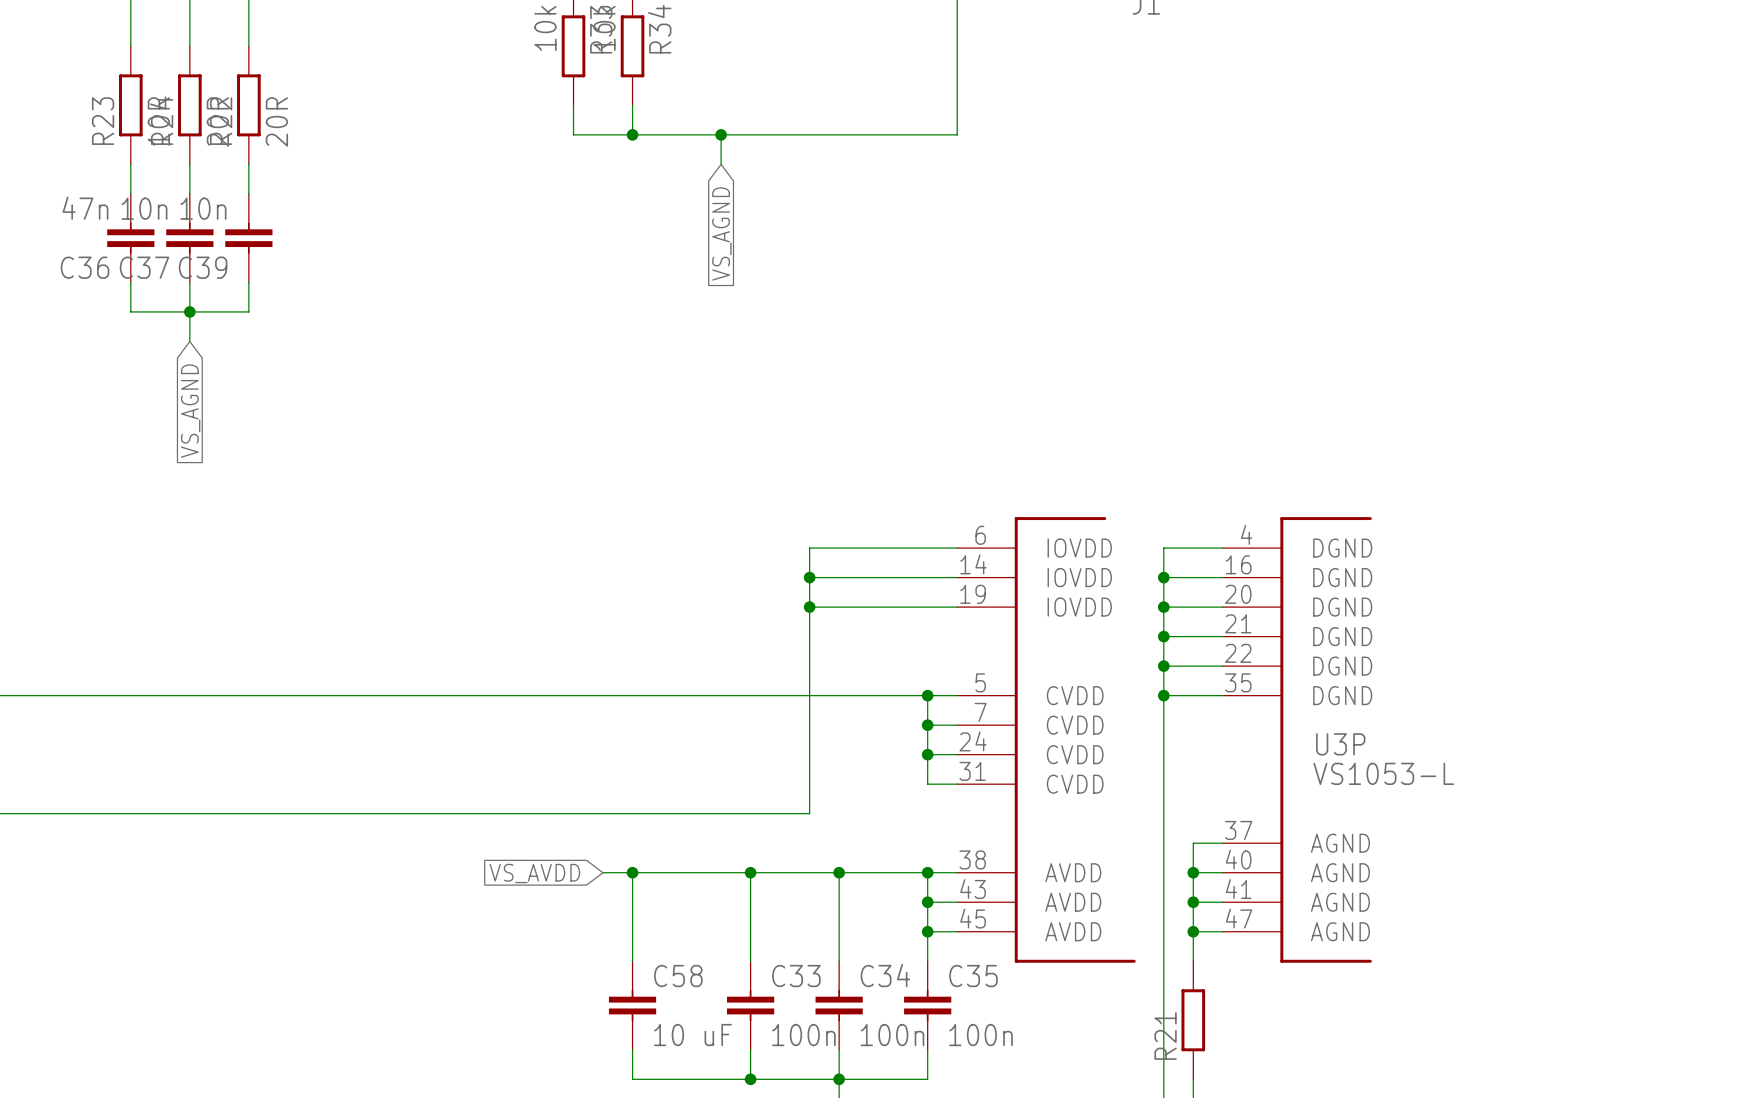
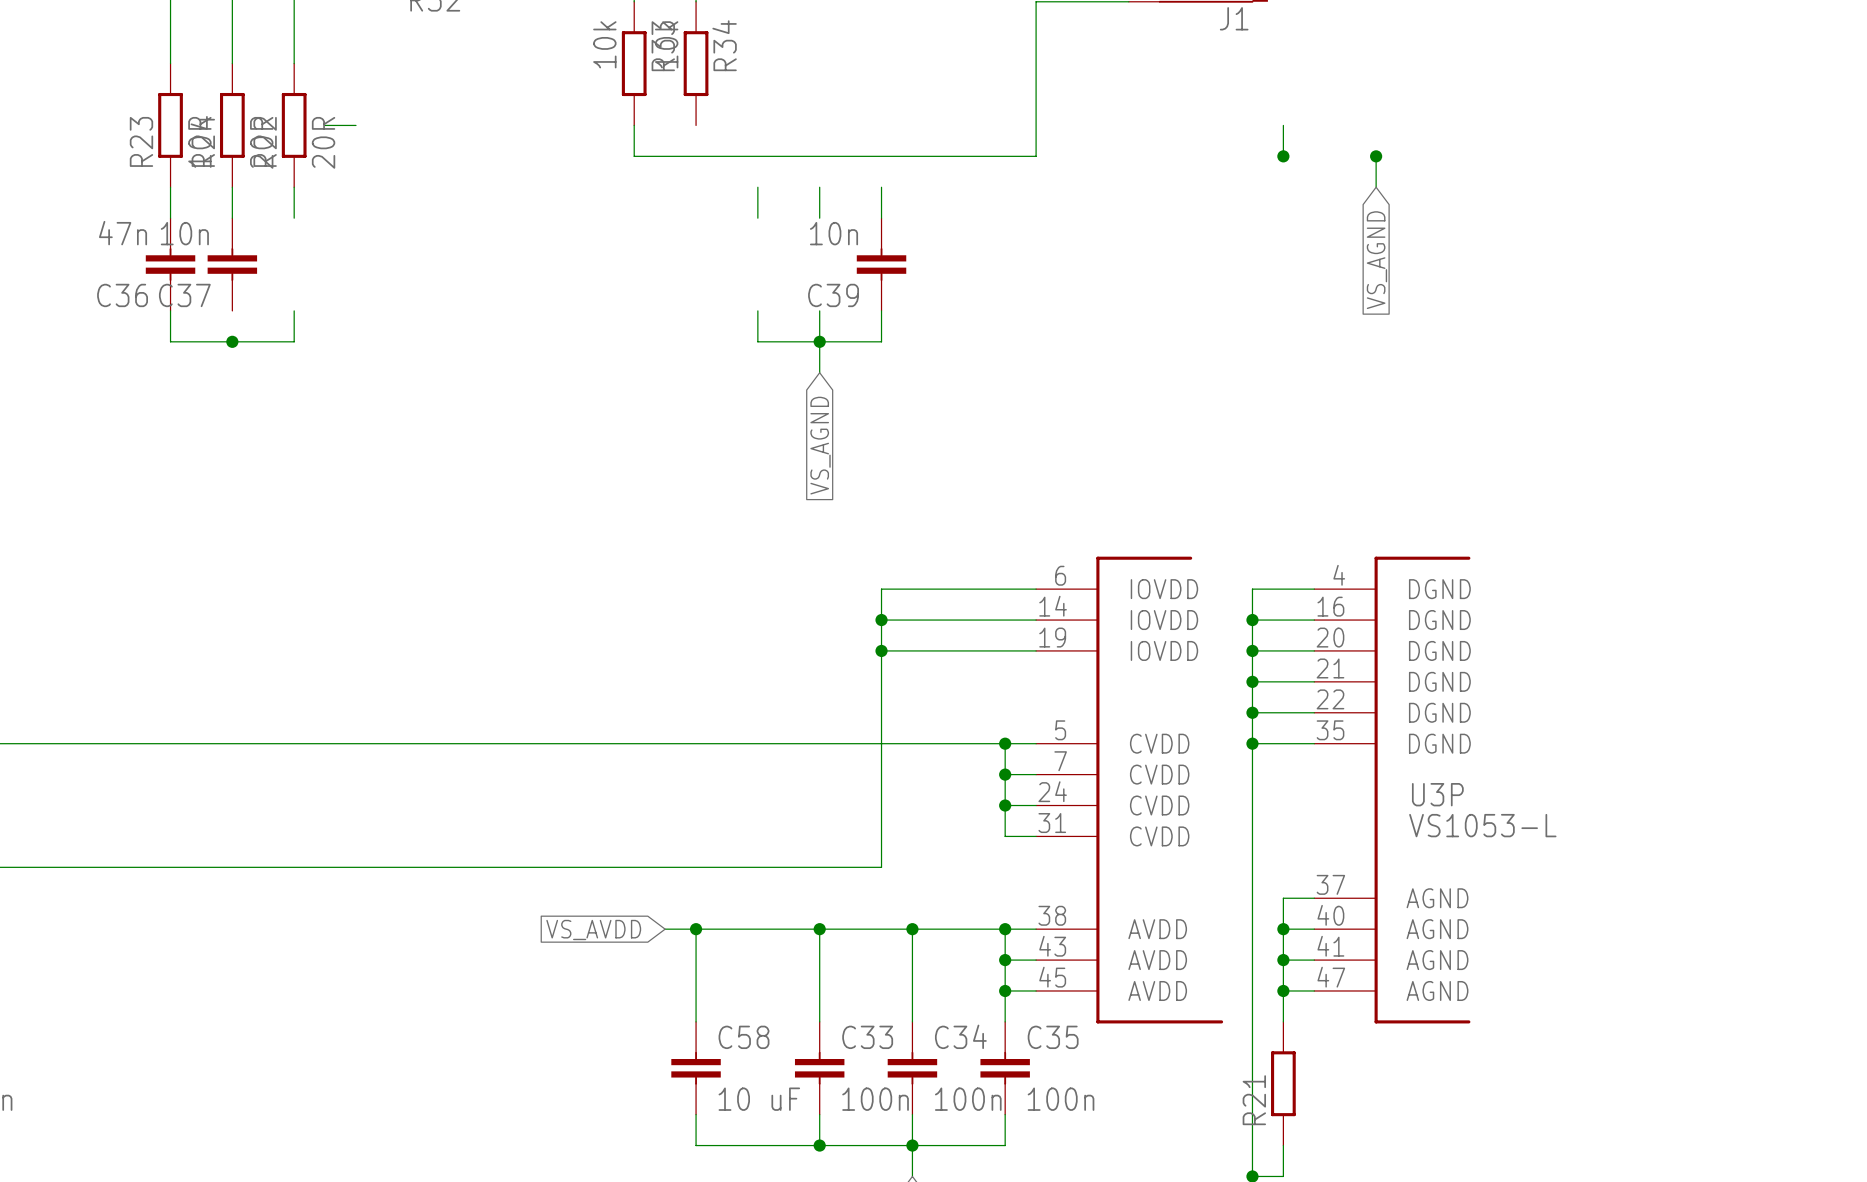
wire: none -> (325, 125) (356, 125)
wire: (632, 105) (632, 134) -> (757, 187) (757, 218)
wire: none -> (1283, 125) (1283, 156)
junction: (632, 134) -> none
wire: (721, 134) (721, 164) -> (819, 187) (819, 218)
junction: (721, 134) -> none
junction: none -> (1283, 156)
wire: none -> (1376, 156) (1376, 187)
junction: none -> (1376, 156)
wire: none -> (881, 187) (881, 218)
global label position: VS_AGND (721, 233) -> VS_AGND (820, 445)
global label: none -> VS_AGND (1376, 260)
C39 position: (248, 238) -> (881, 264)
wire: (189, 282) (189, 341) -> none
wire: none -> (757, 310) (757, 341) (881, 341) (881, 310)
wire: none -> (819, 310) (819, 372)
junction: none -> (819, 341)
global label: VS_AGND (190, 411) -> none

